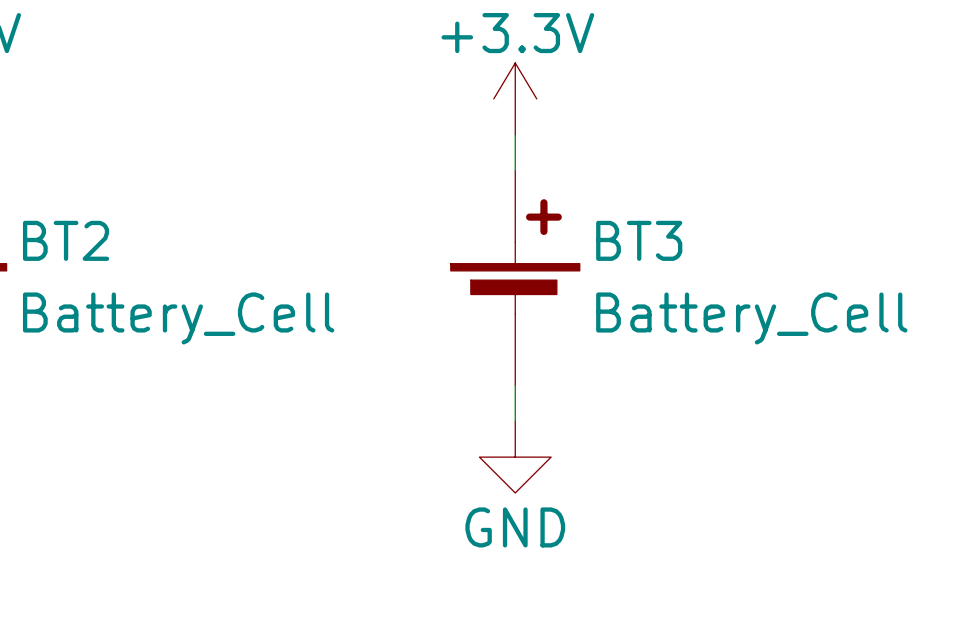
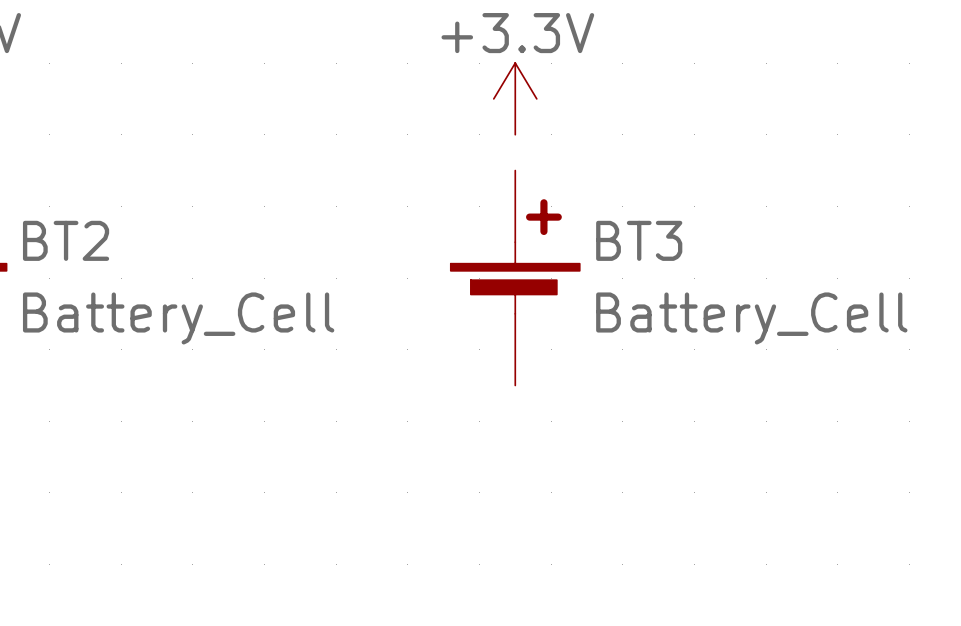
wire: (515, 134) (515, 170) -> none
wire: (515, 385) (515, 421) -> none
power symbol: GND (515, 457) -> none

